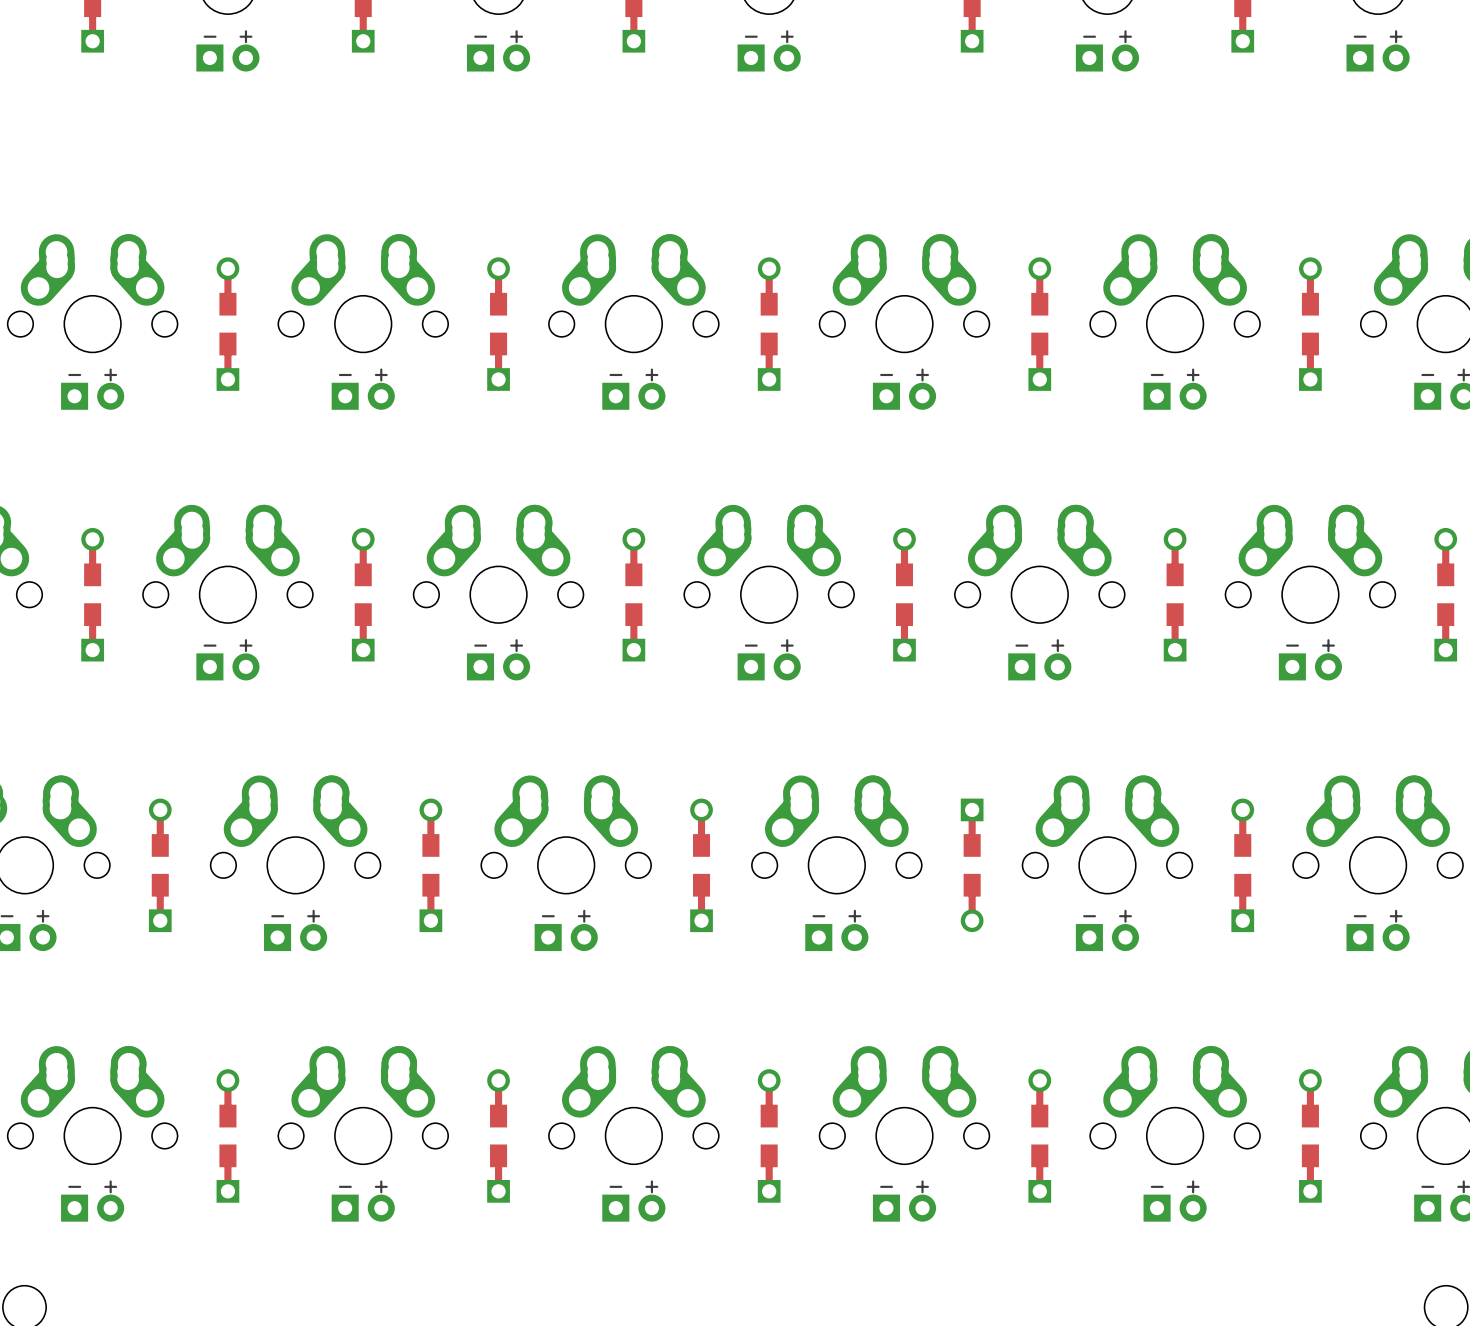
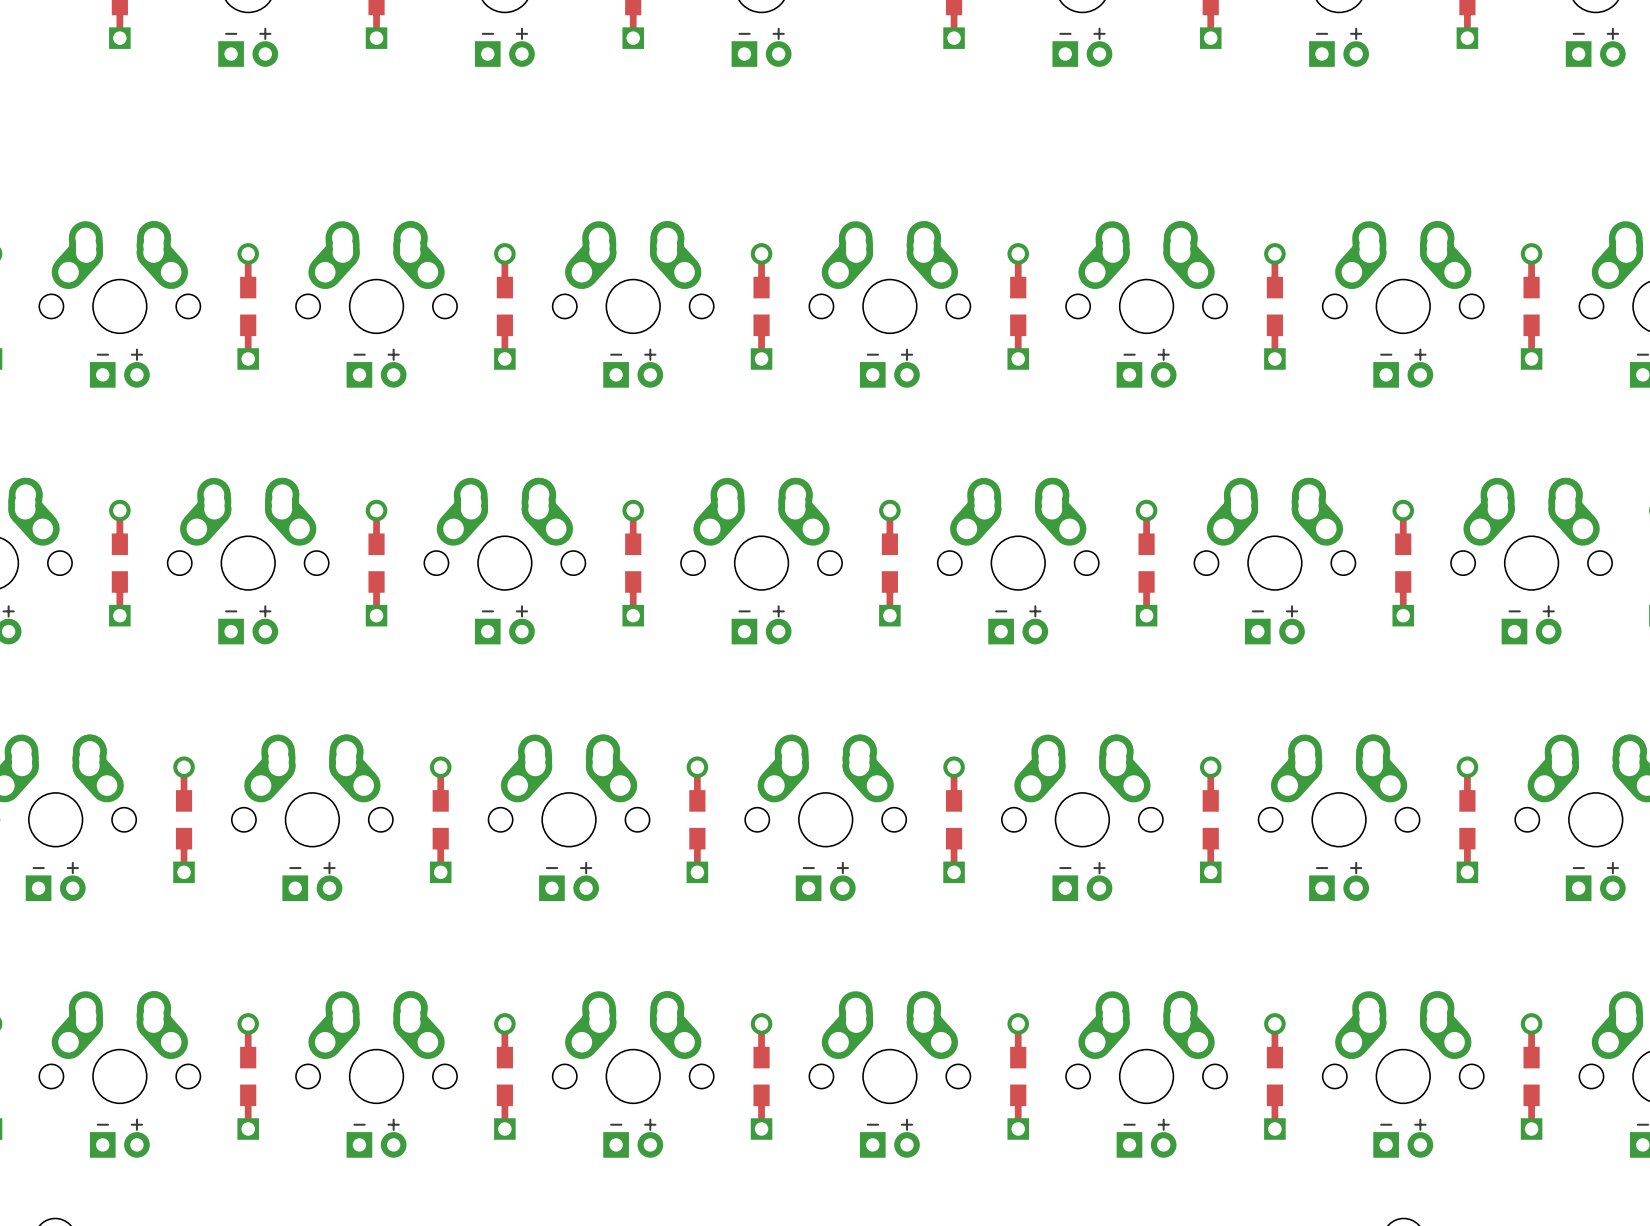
part rotation: 0° (972, 865) -> 180° (954, 819)

